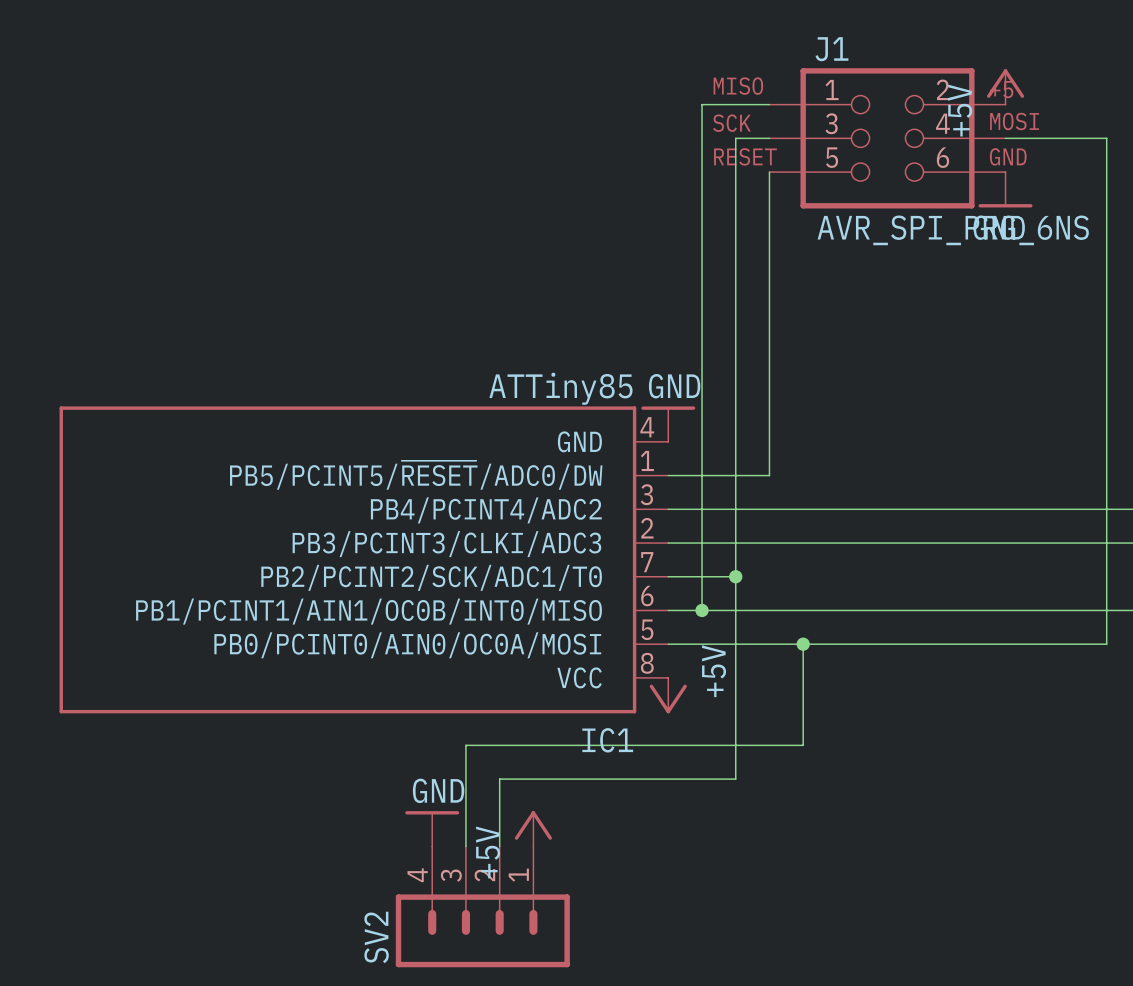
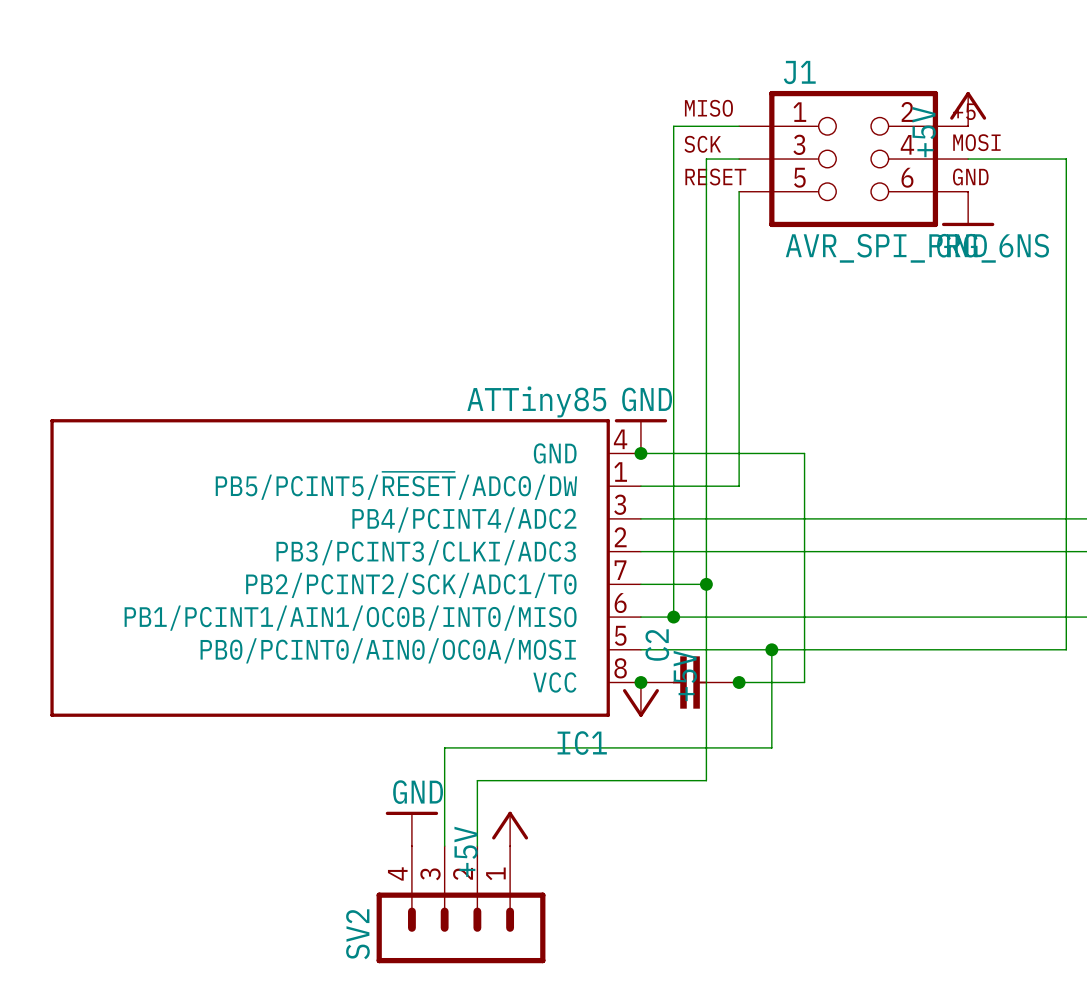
wire: none -> (640, 453) (804, 453) (804, 682) (739, 682)
junction: none -> (640, 453)
junction: none -> (640, 682)
C2: none -> (690, 682)
junction: none -> (739, 682)

